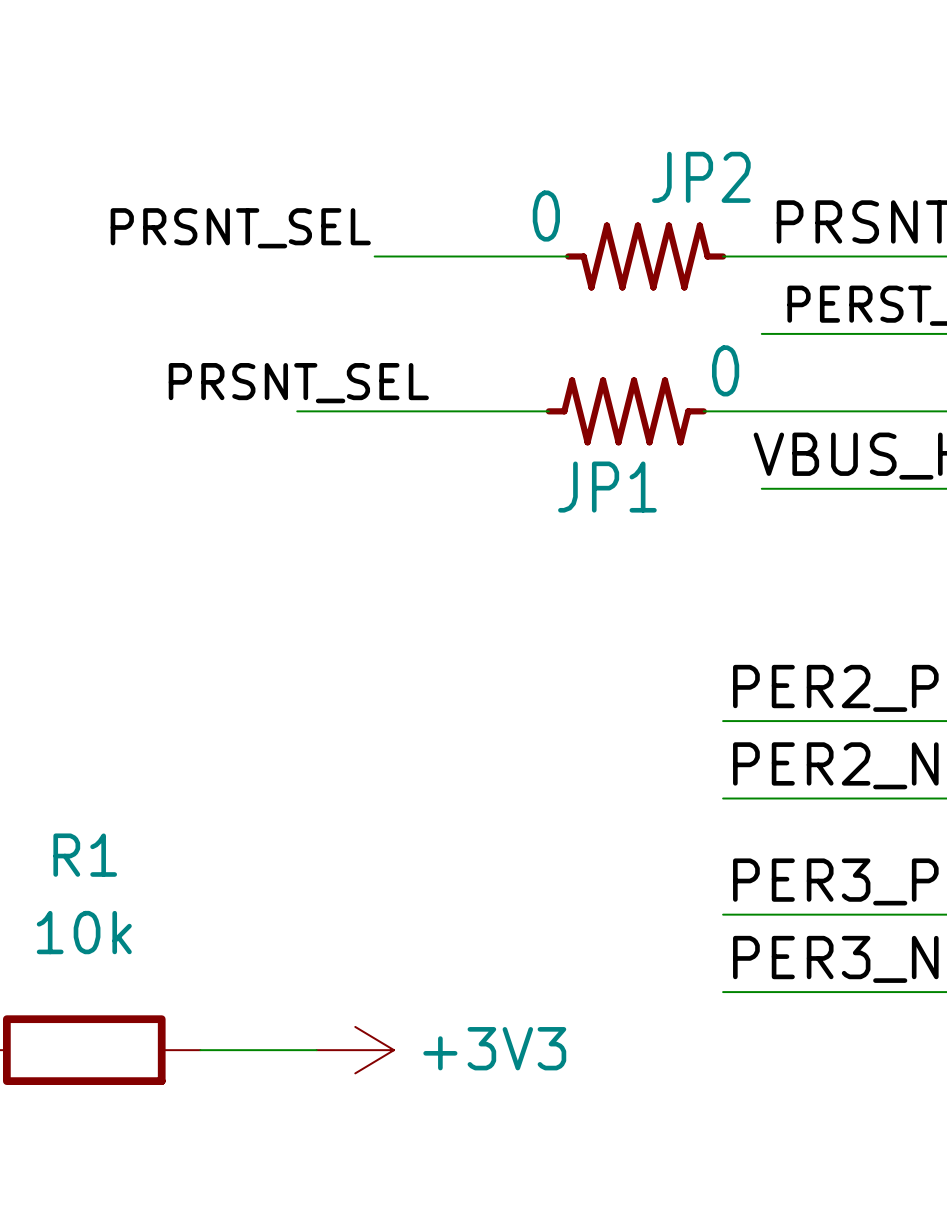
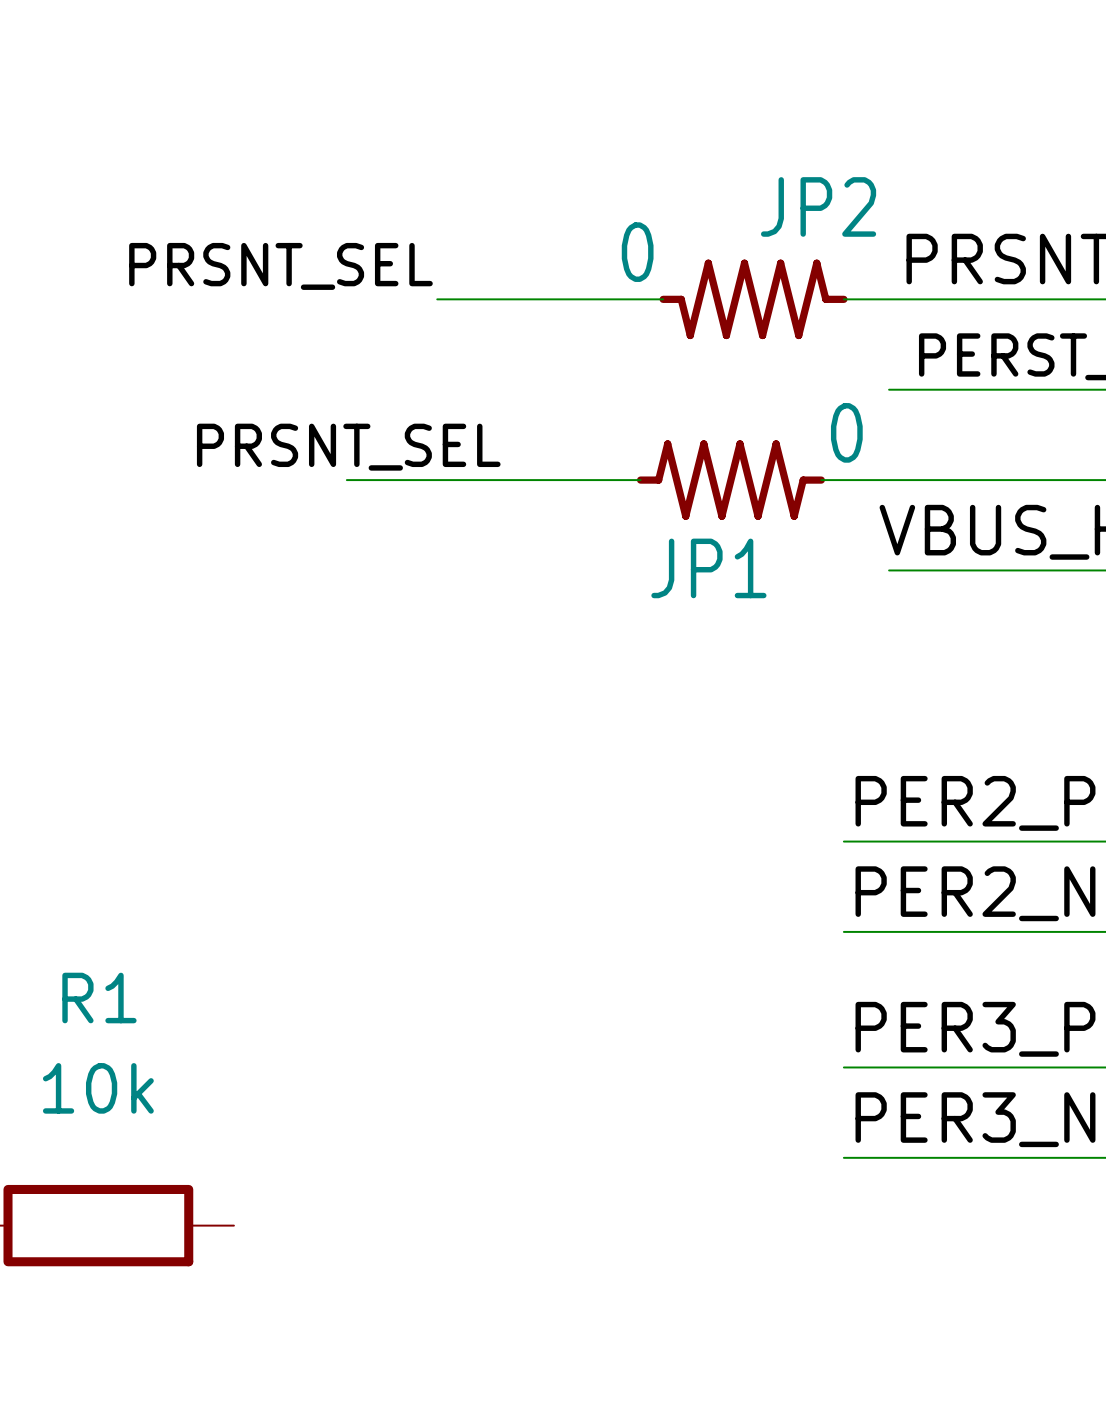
wire: (200, 1050) (316, 1050) -> none
power symbol: +3V3 (355, 1050) -> none

